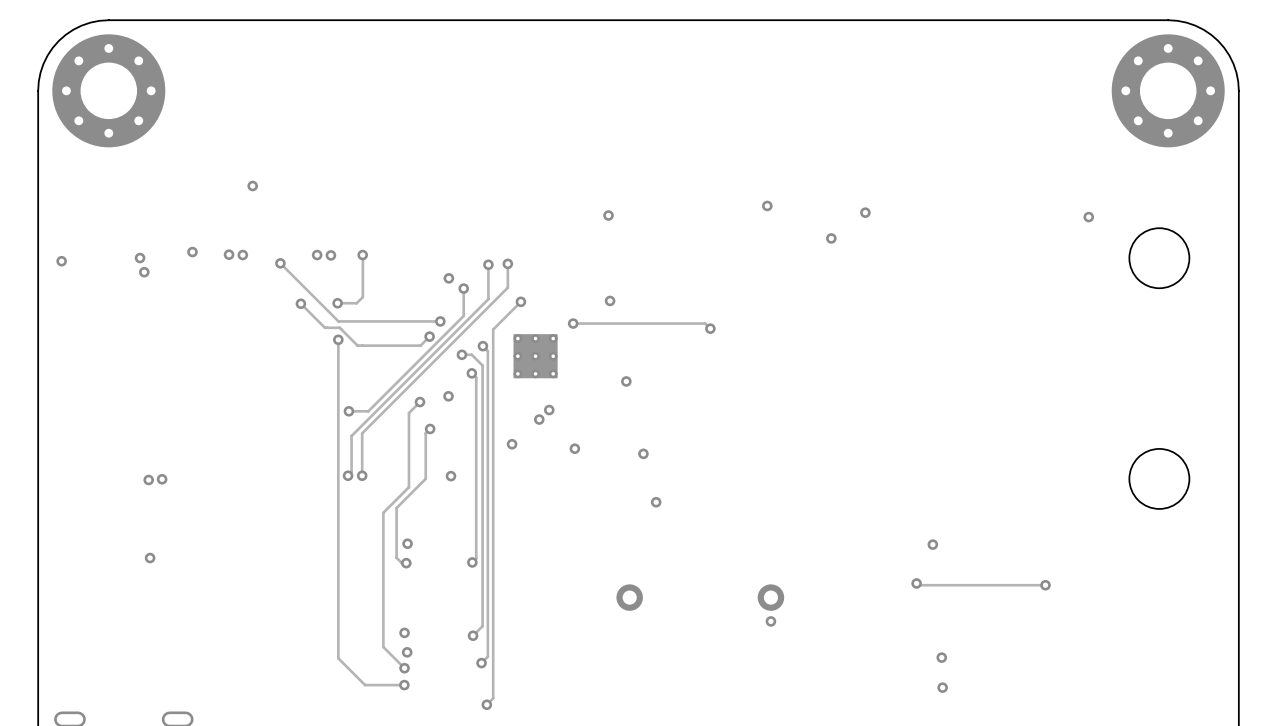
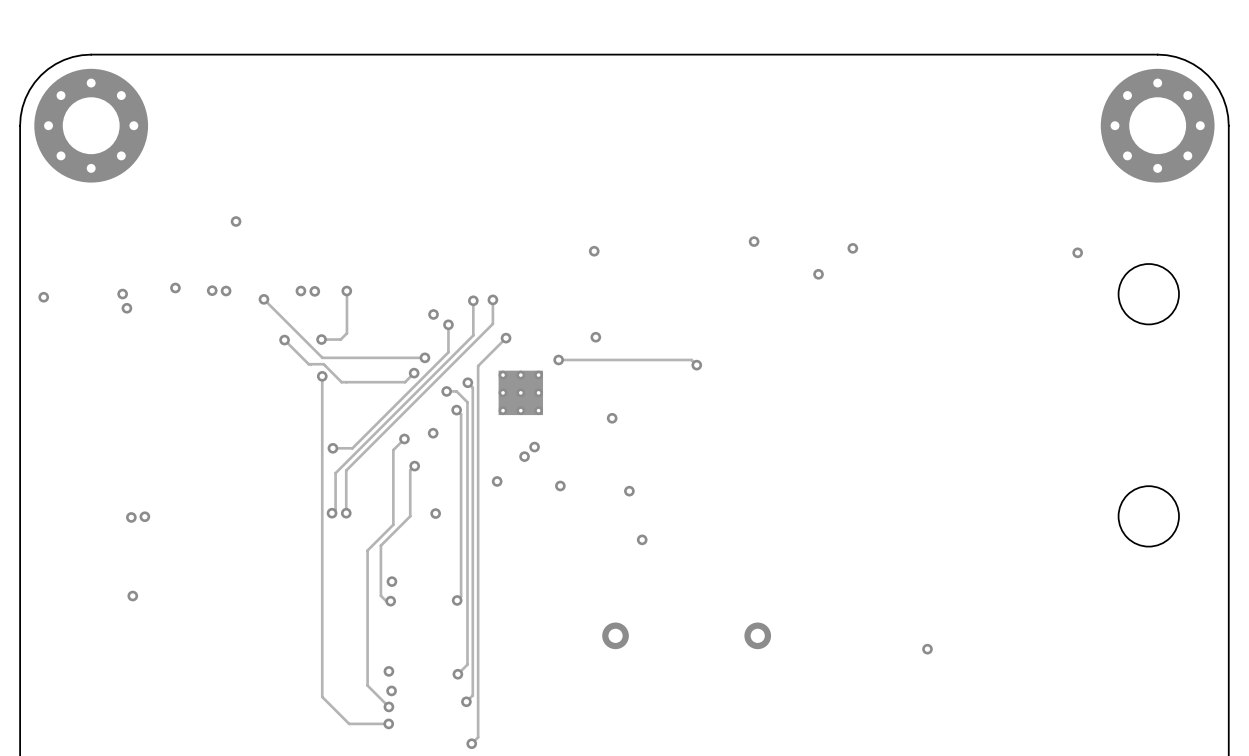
via: (932, 544) -> none
track: (916, 583) (918, 585) (1045, 585) -> none
via: (916, 583) -> none
via: (1045, 585) -> none
via: none -> (927, 649)
via: (770, 621) -> none
via: (941, 657) -> none
via: (942, 687) -> none

